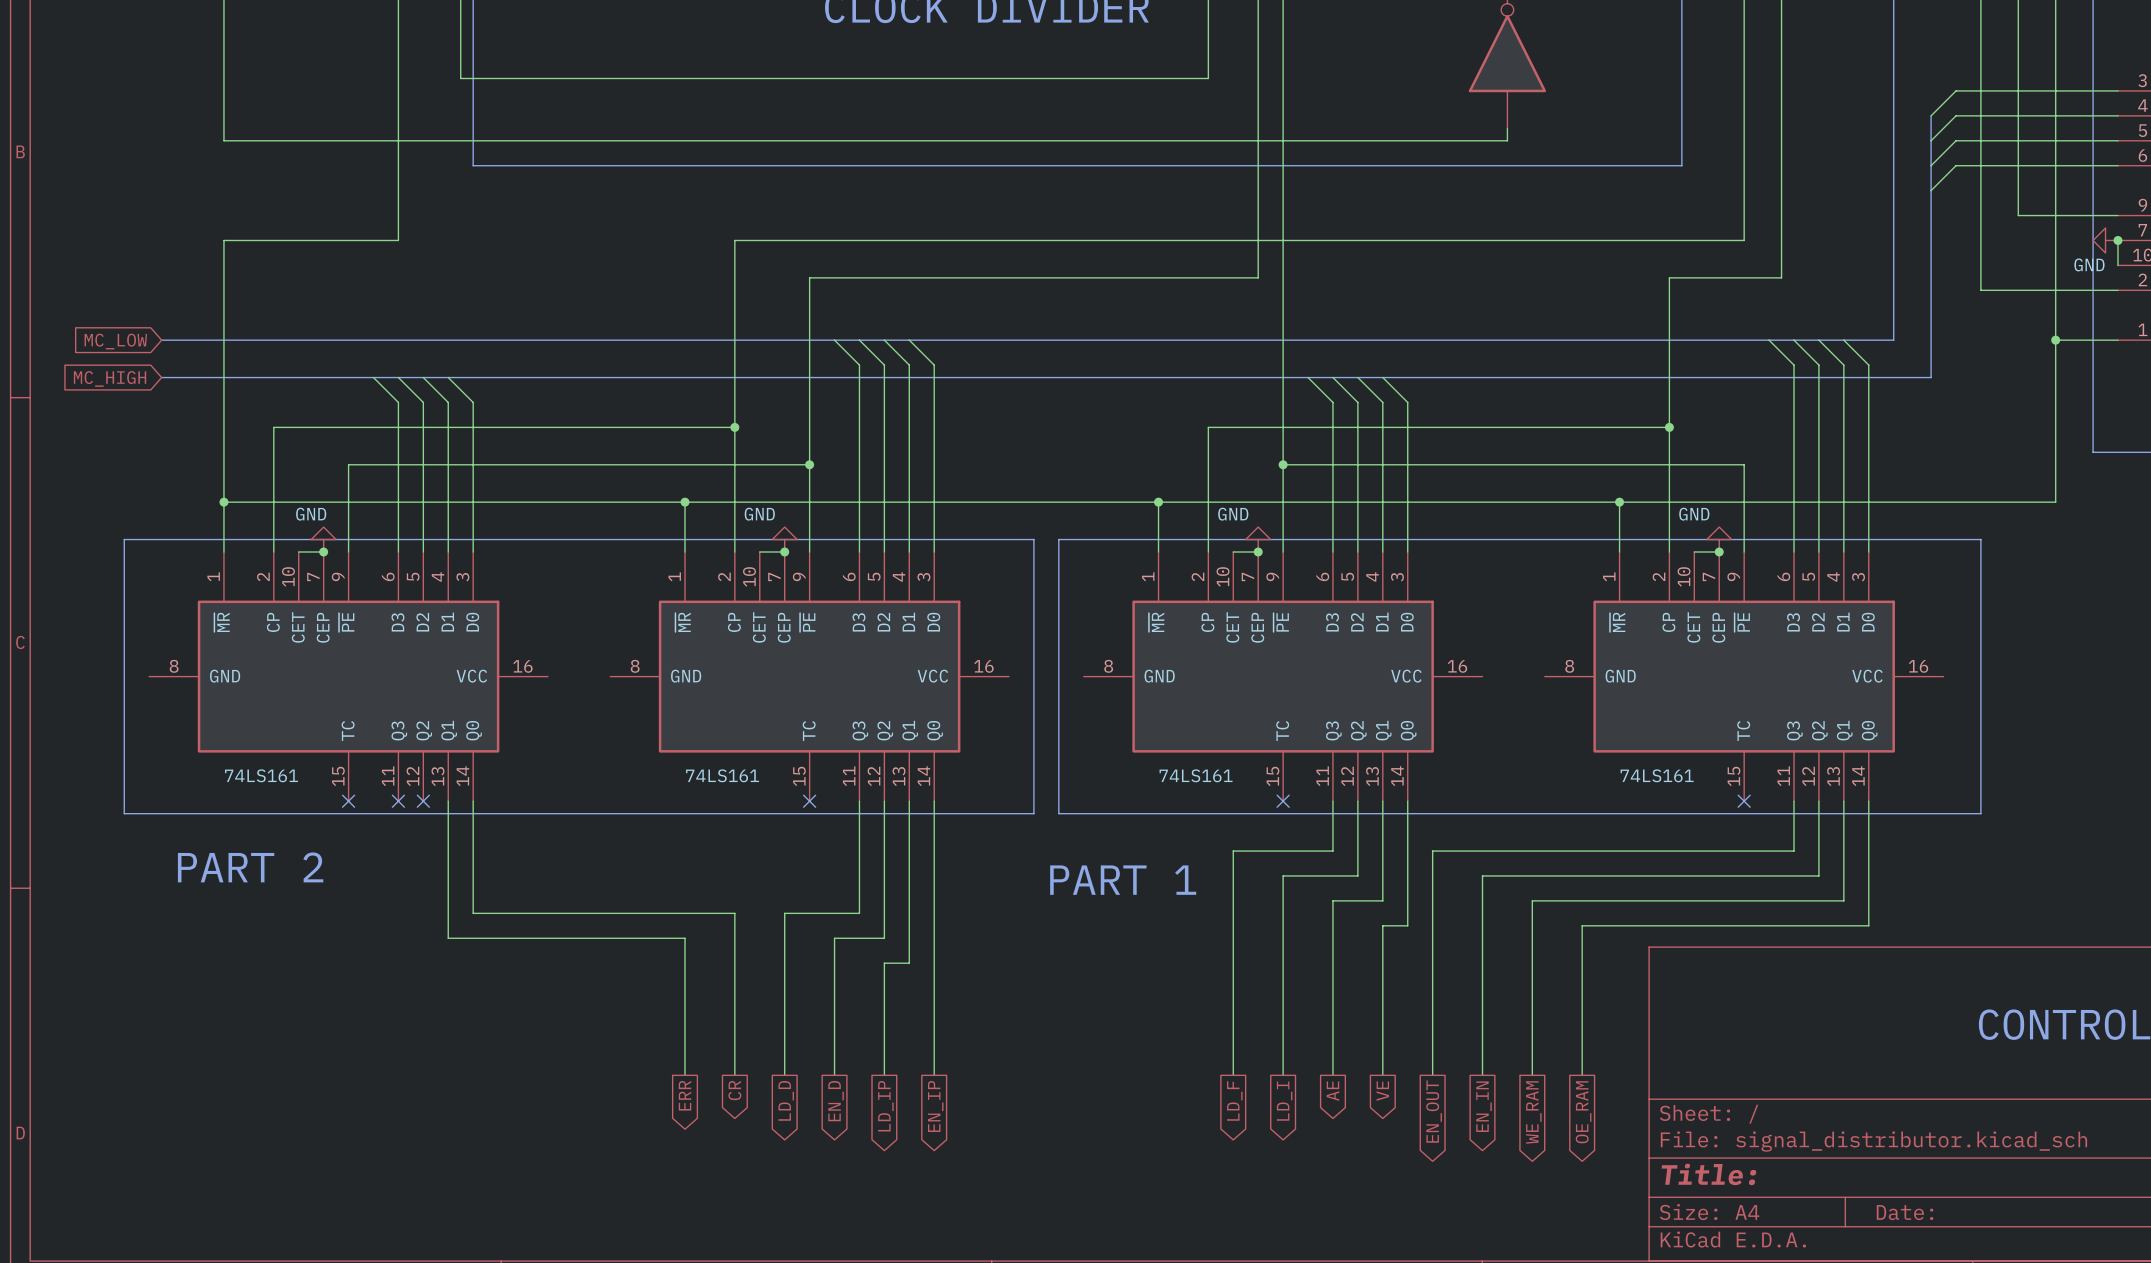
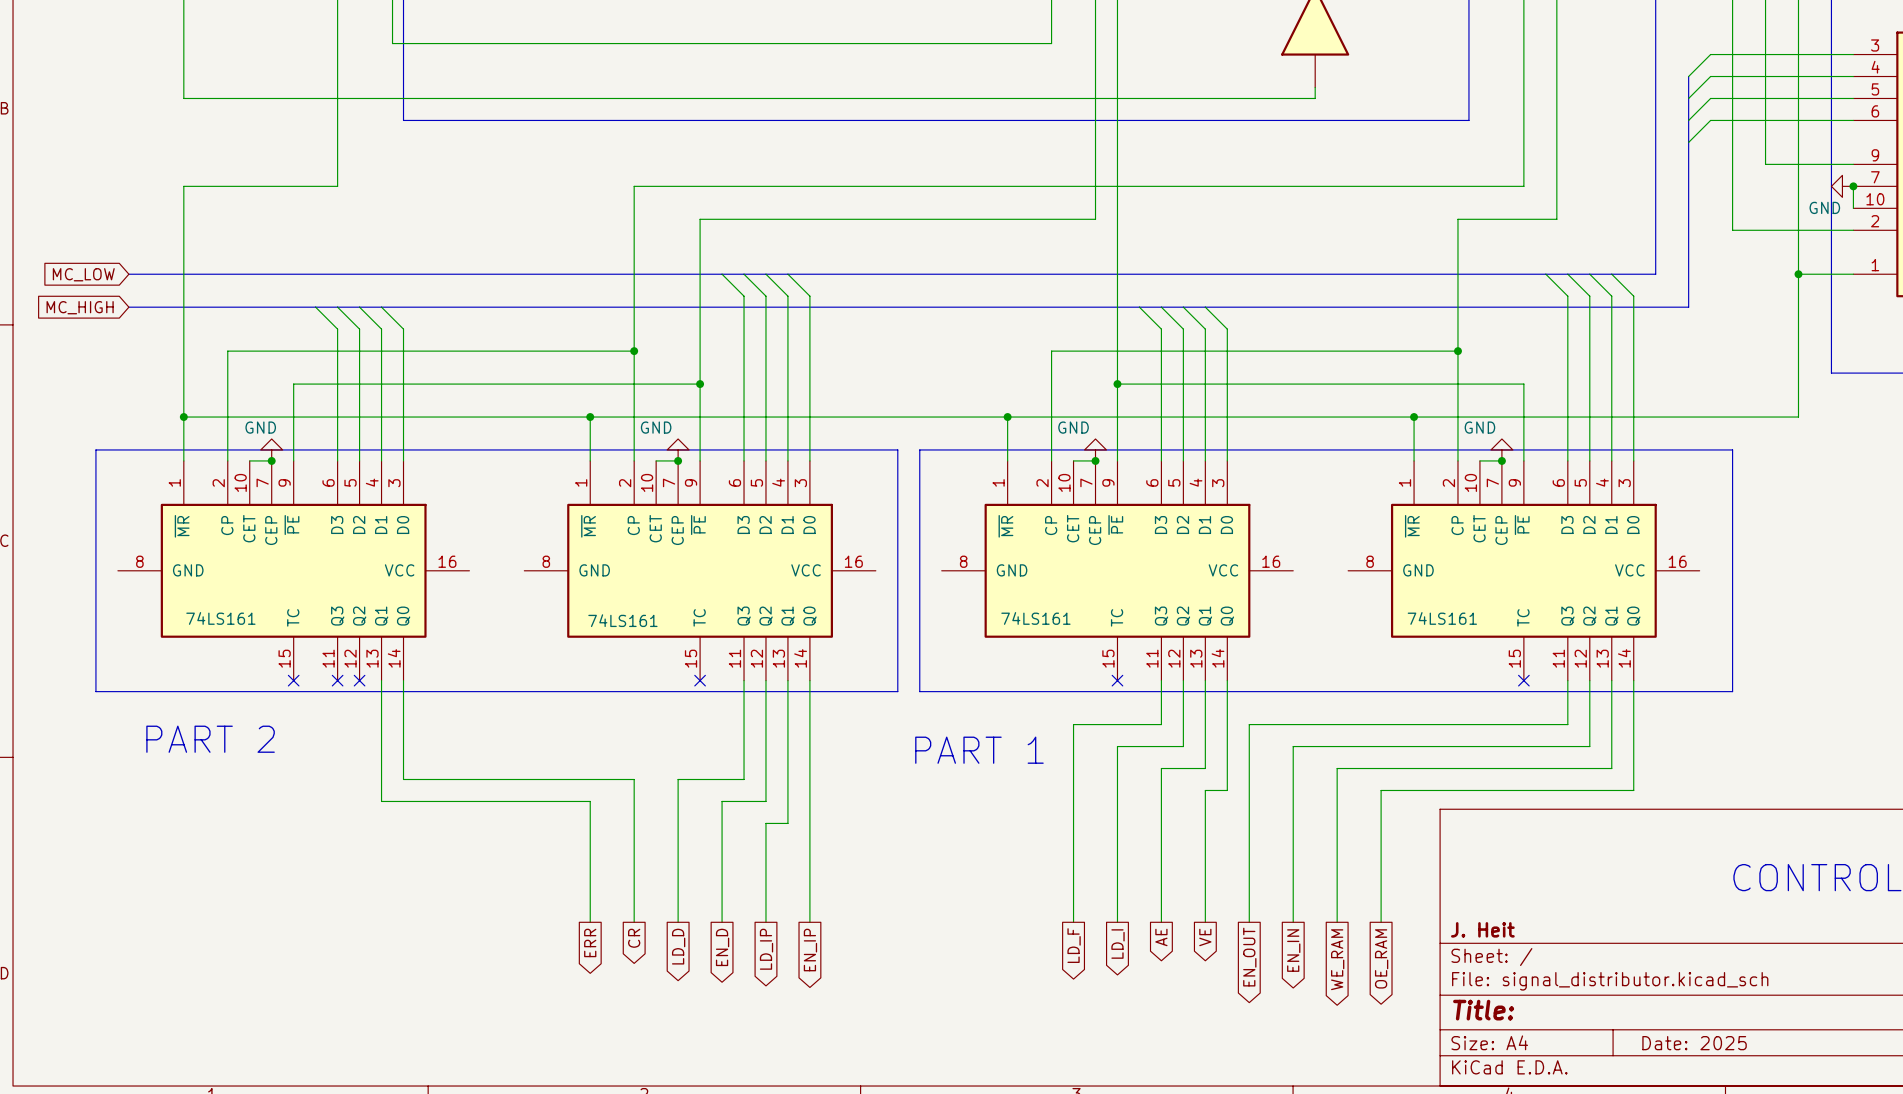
part value position: 74LS161 (261, 775) -> 74LS161 (220, 618)
part value position: 74LS161 (722, 775) -> 74LS161 (622, 620)
part value position: 74LS161 (1196, 775) -> 74LS161 (1035, 618)
part value position: 74LS161 (1657, 775) -> 74LS161 (1442, 618)
title block: none -> J. Heit (1482, 929)
title block: Date: (1905, 1212) -> Date: 2025 (1694, 1043)

